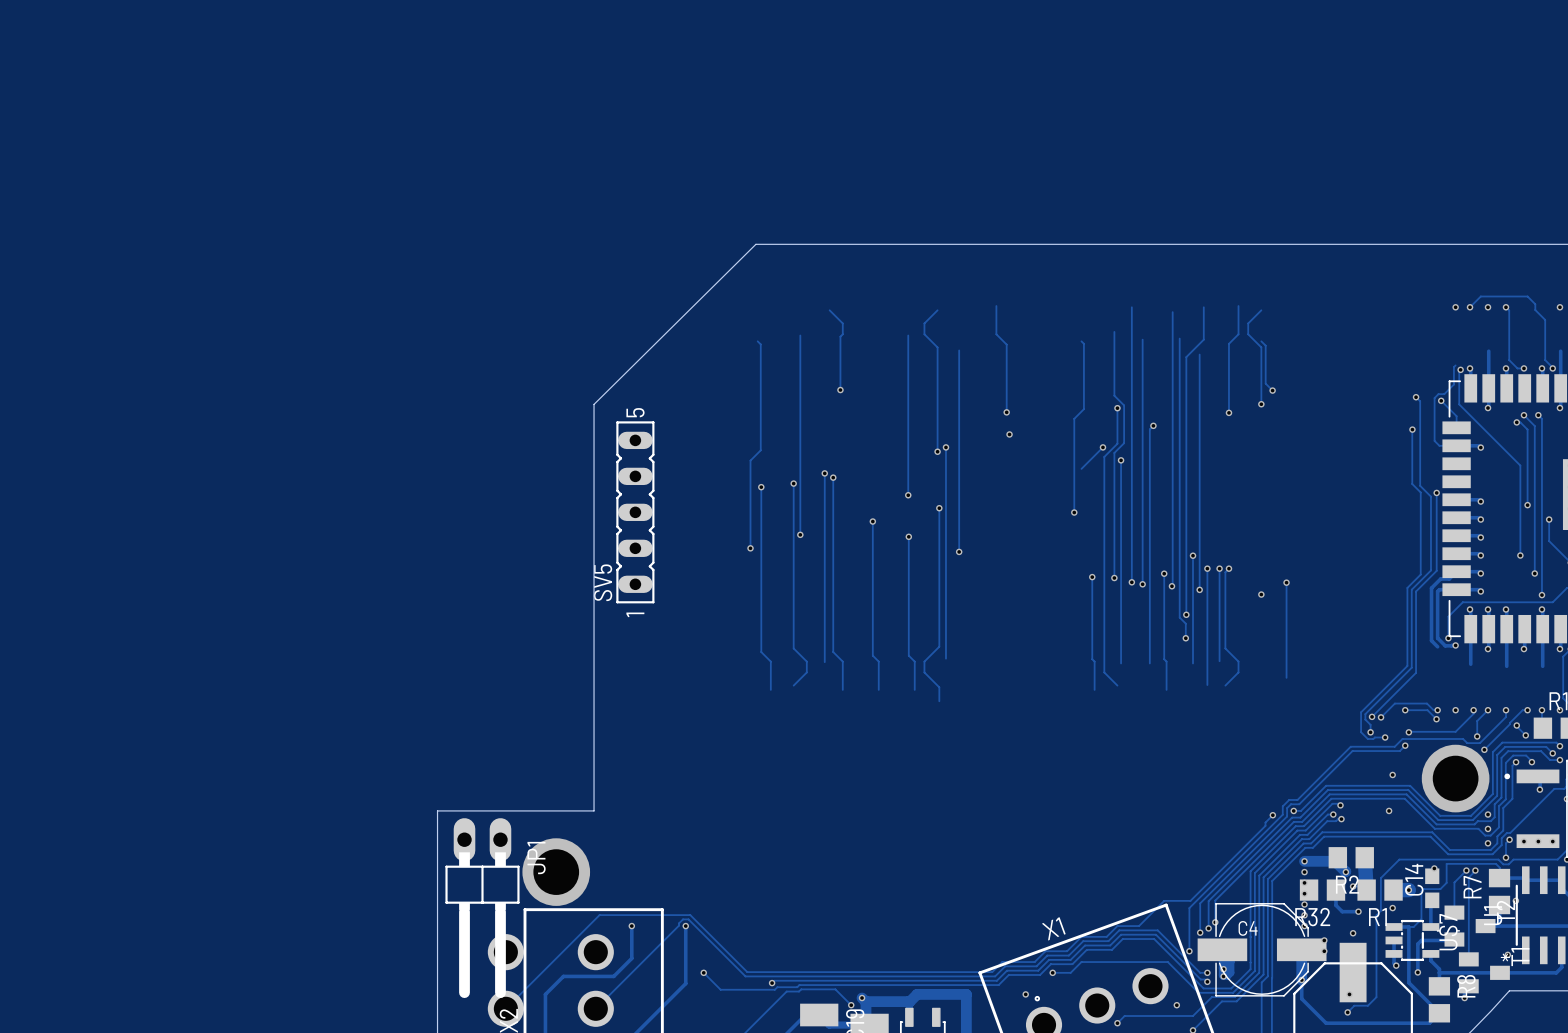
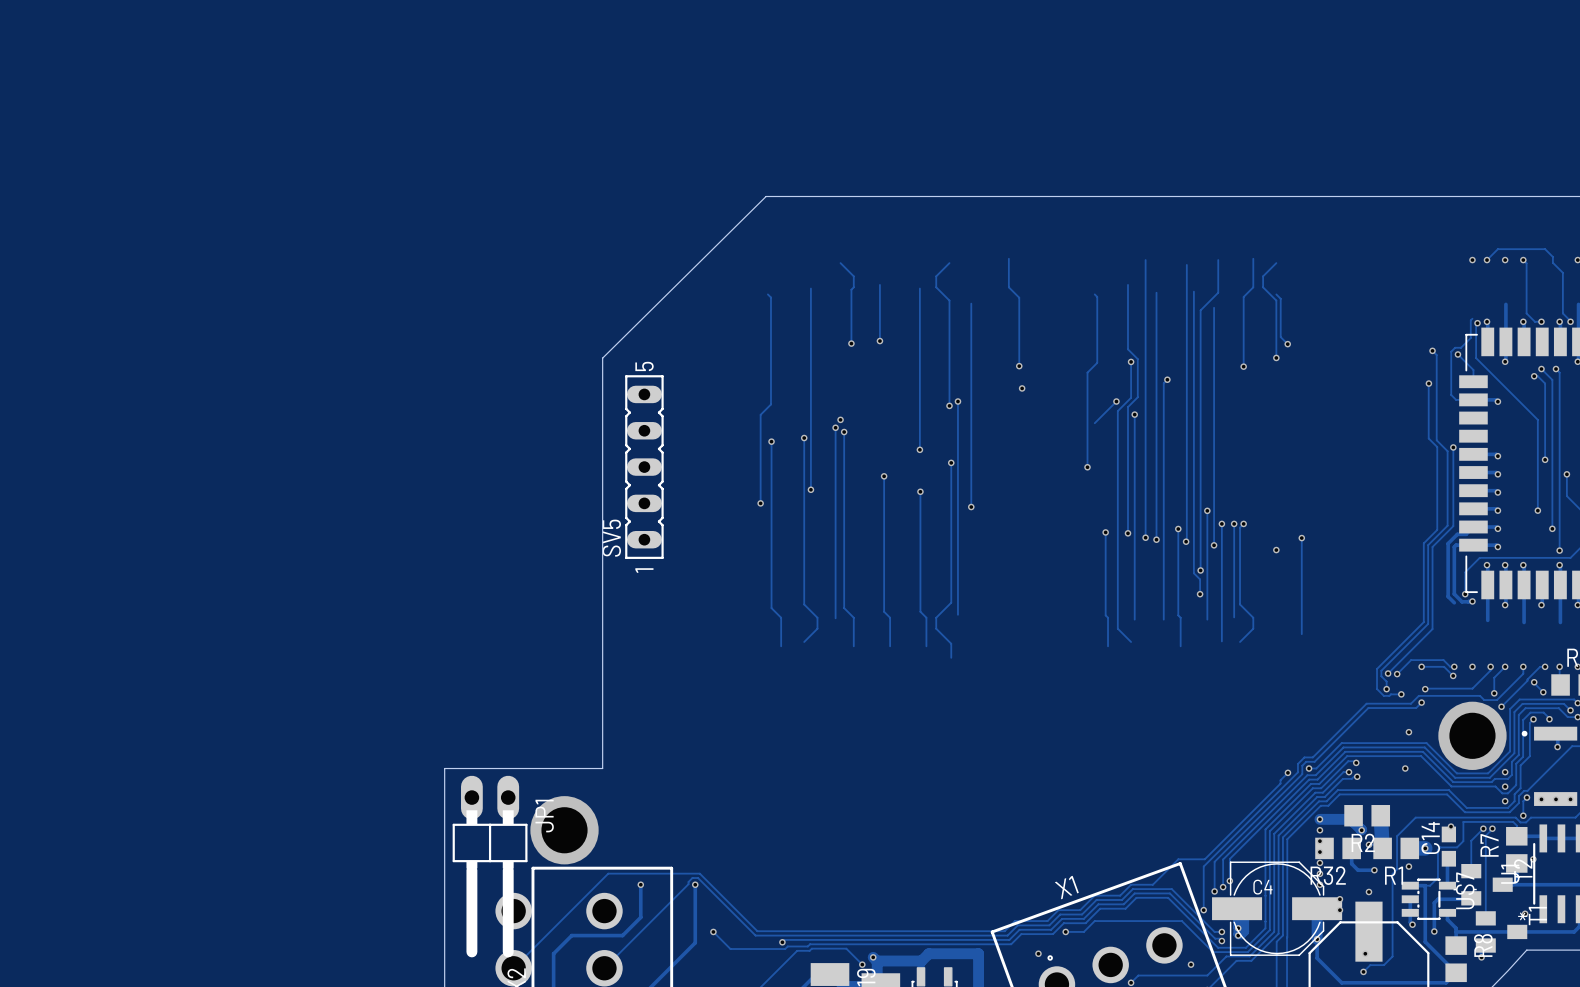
track: none -> (879, 284) (879, 341)
via: none -> (879, 341)
via: none -> (840, 419)

